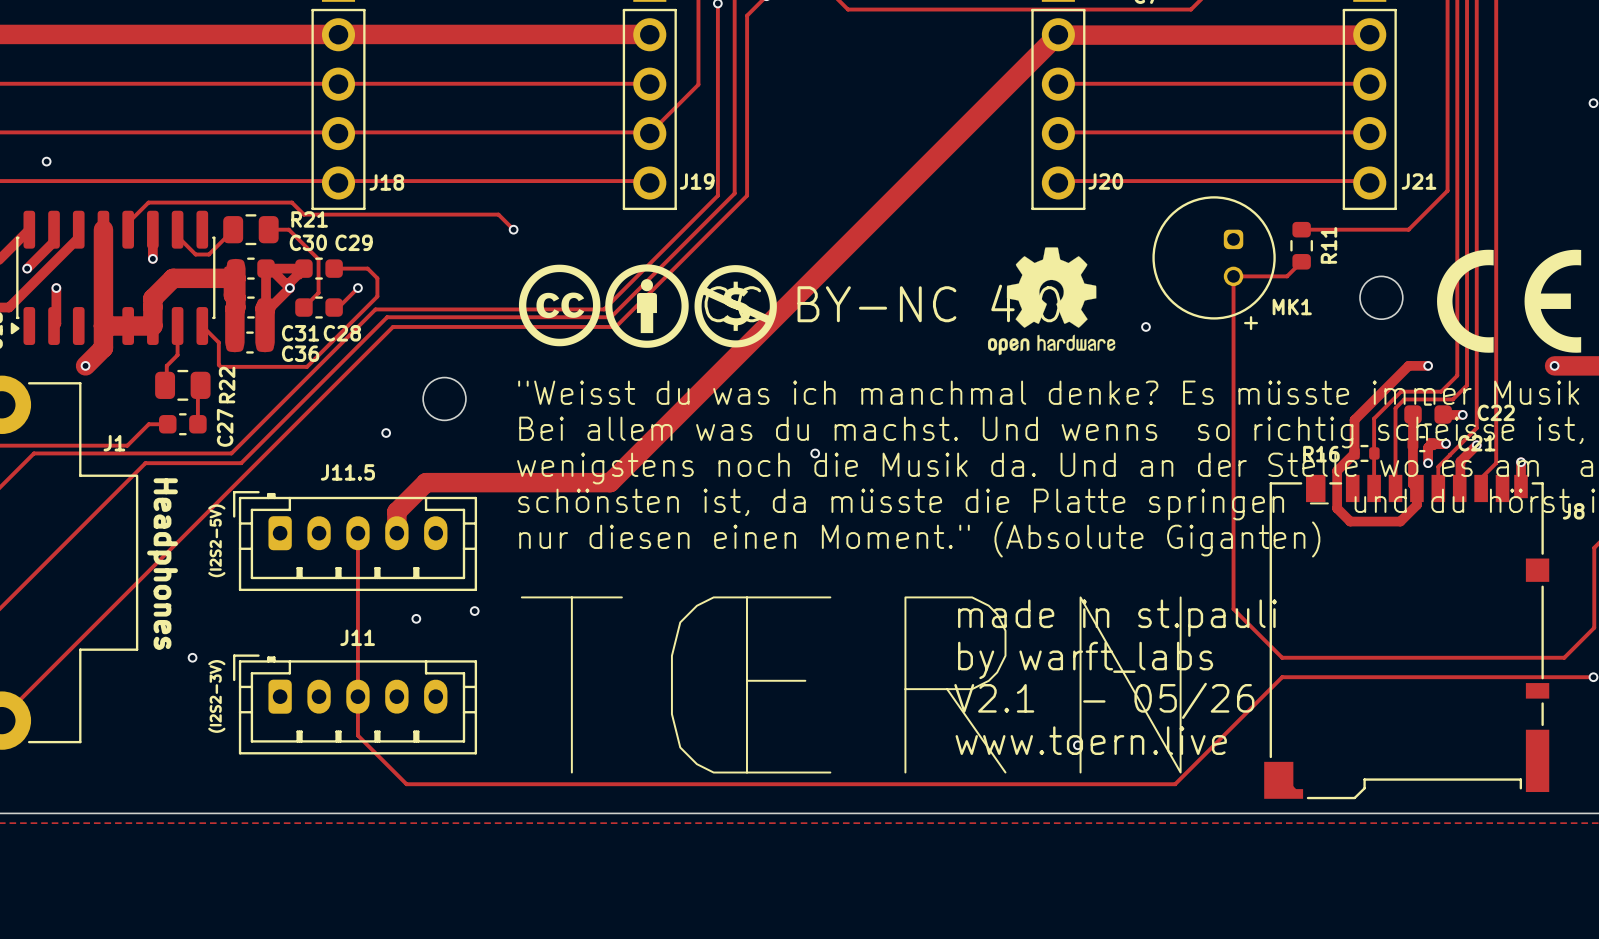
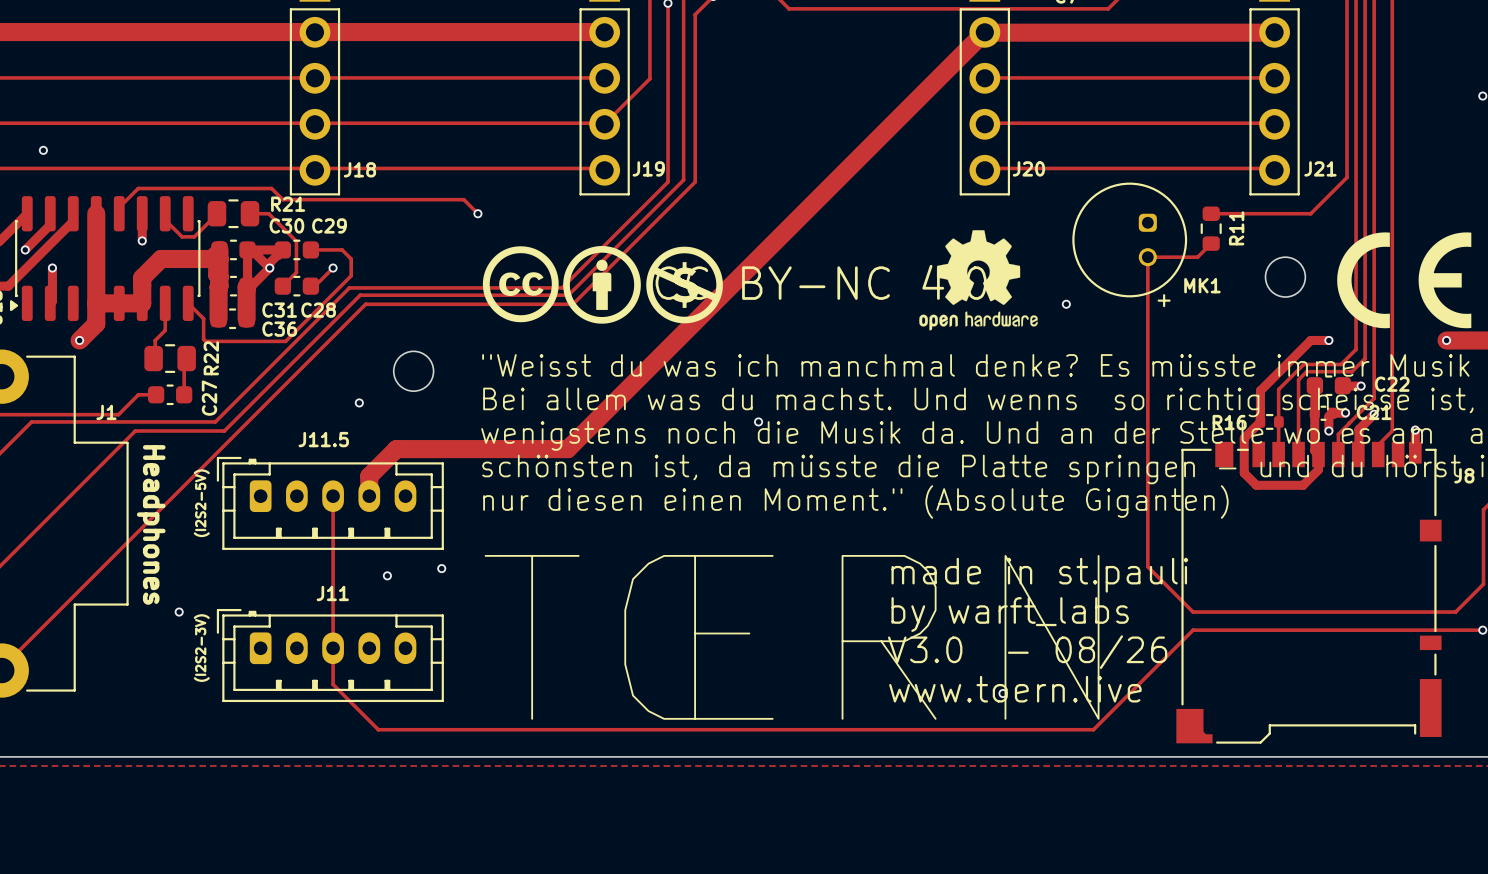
text: V2.1 - 05/26 (1104, 700) -> V3.0 - 08/26 (1027, 652)

